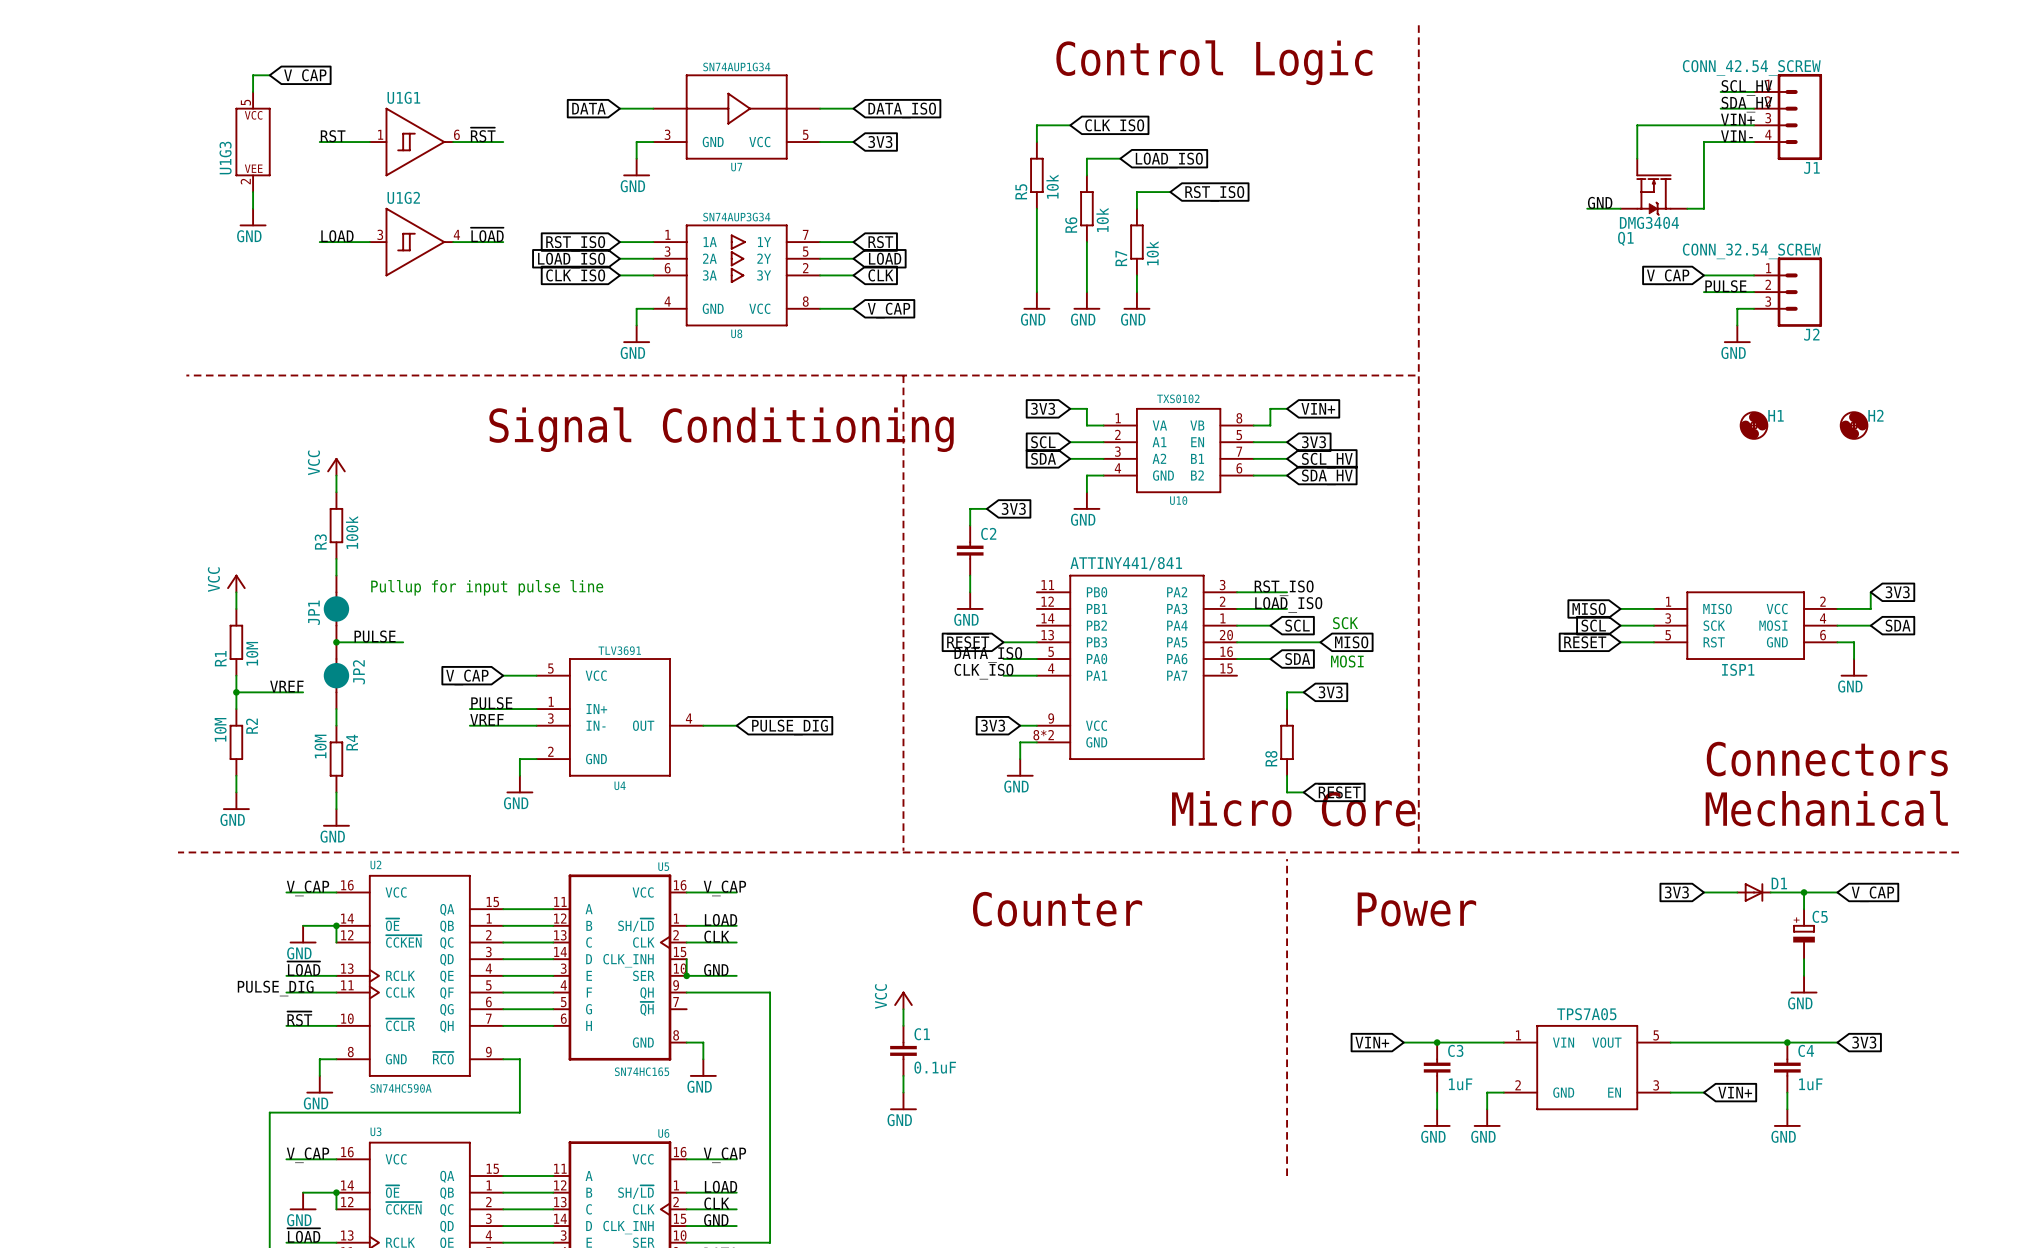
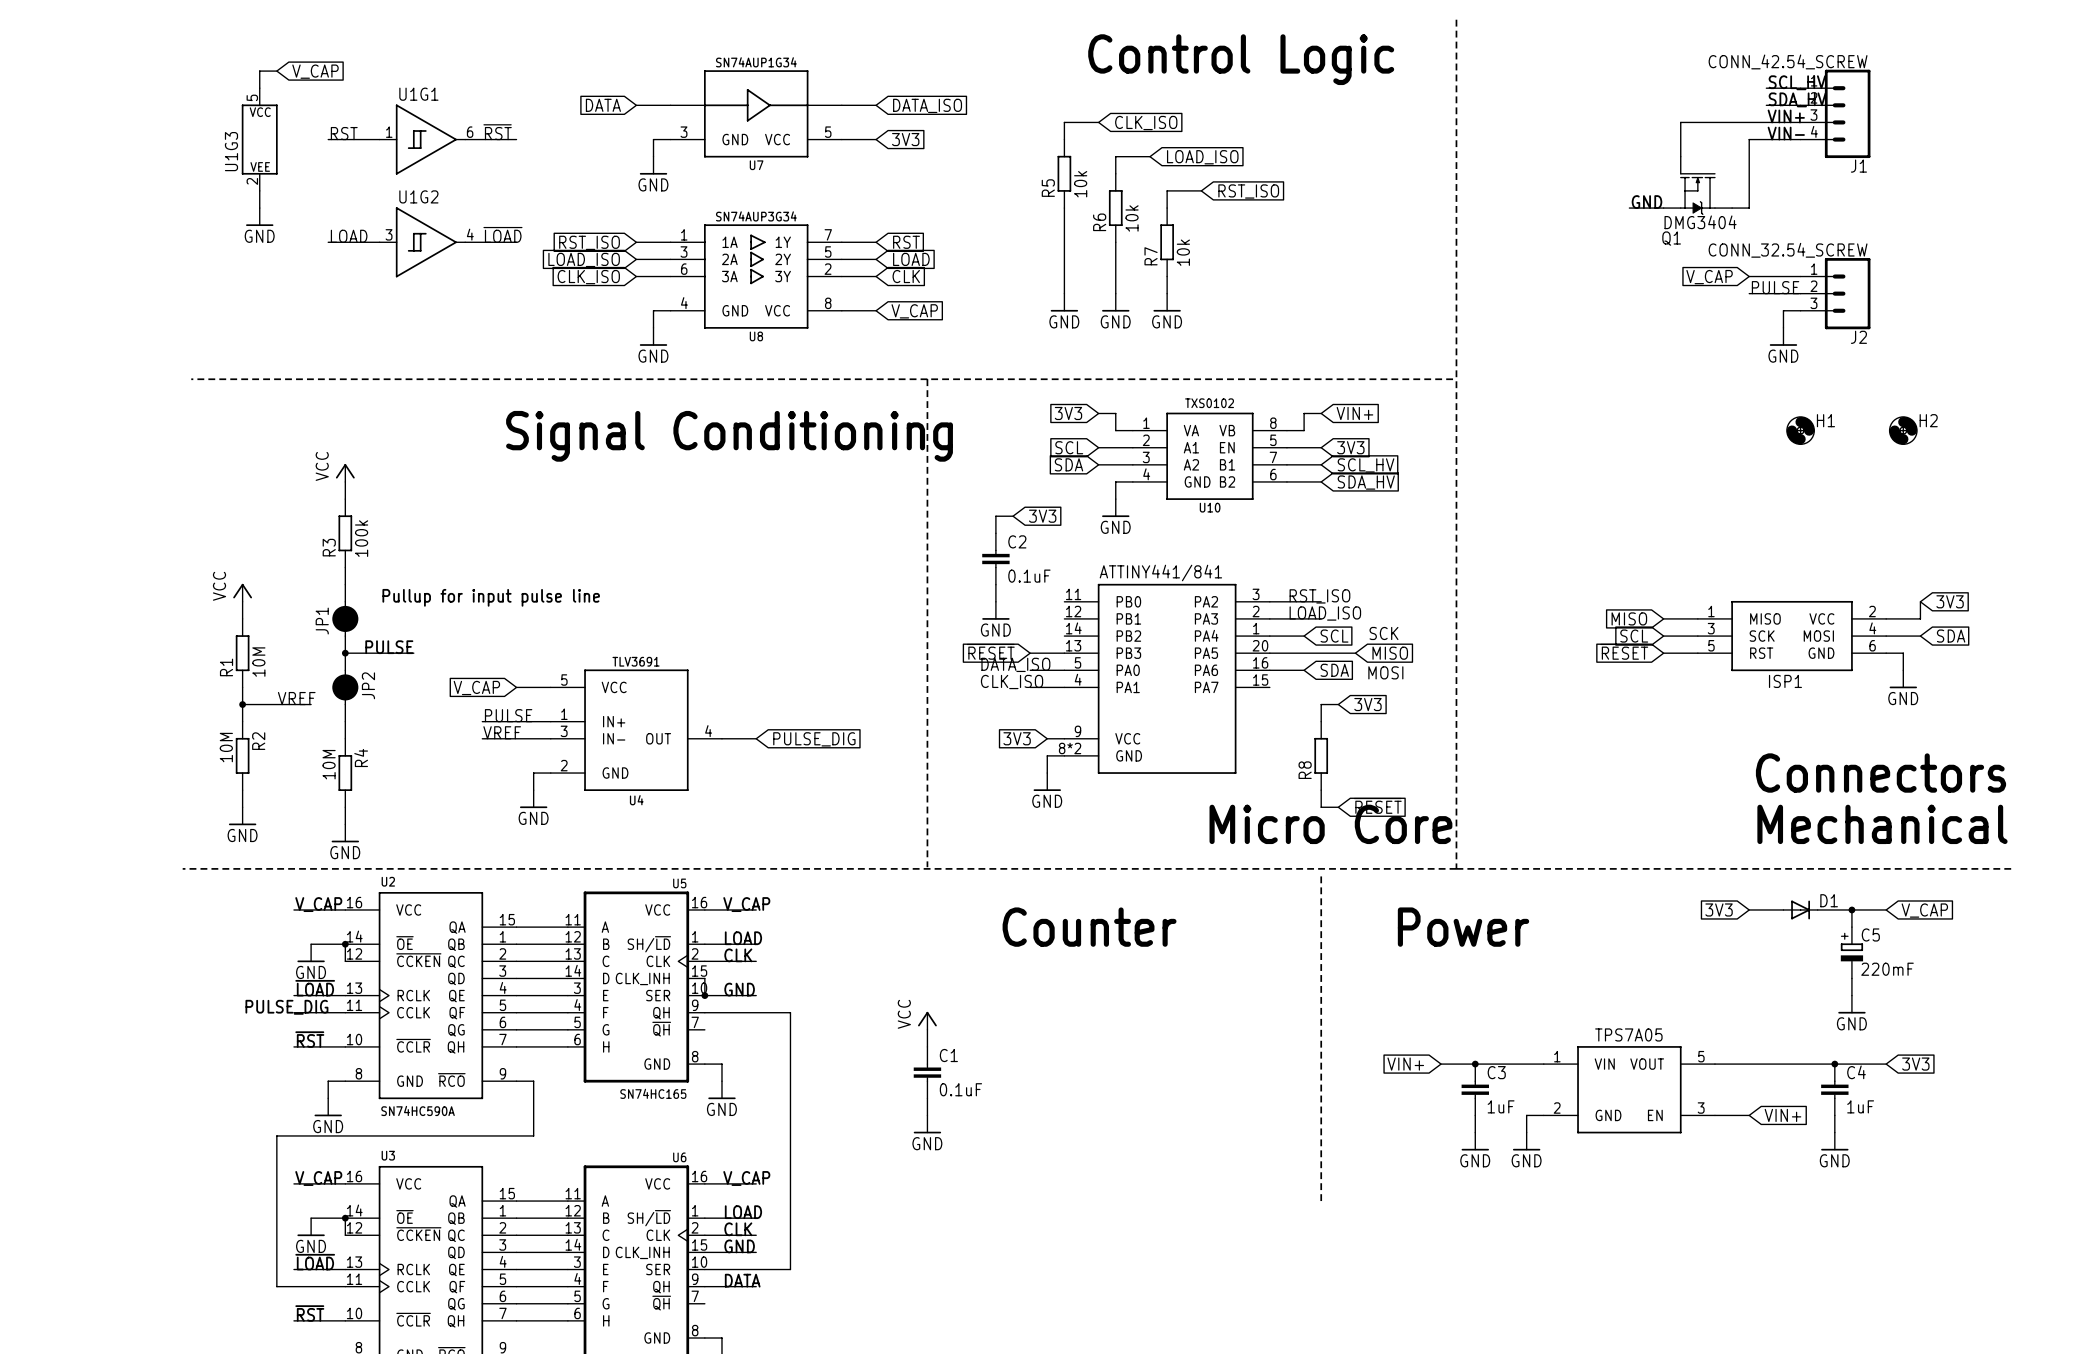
C2 value: none -> 0.1uF (1029, 576)
C5 value: none -> 220mF (1887, 969)

